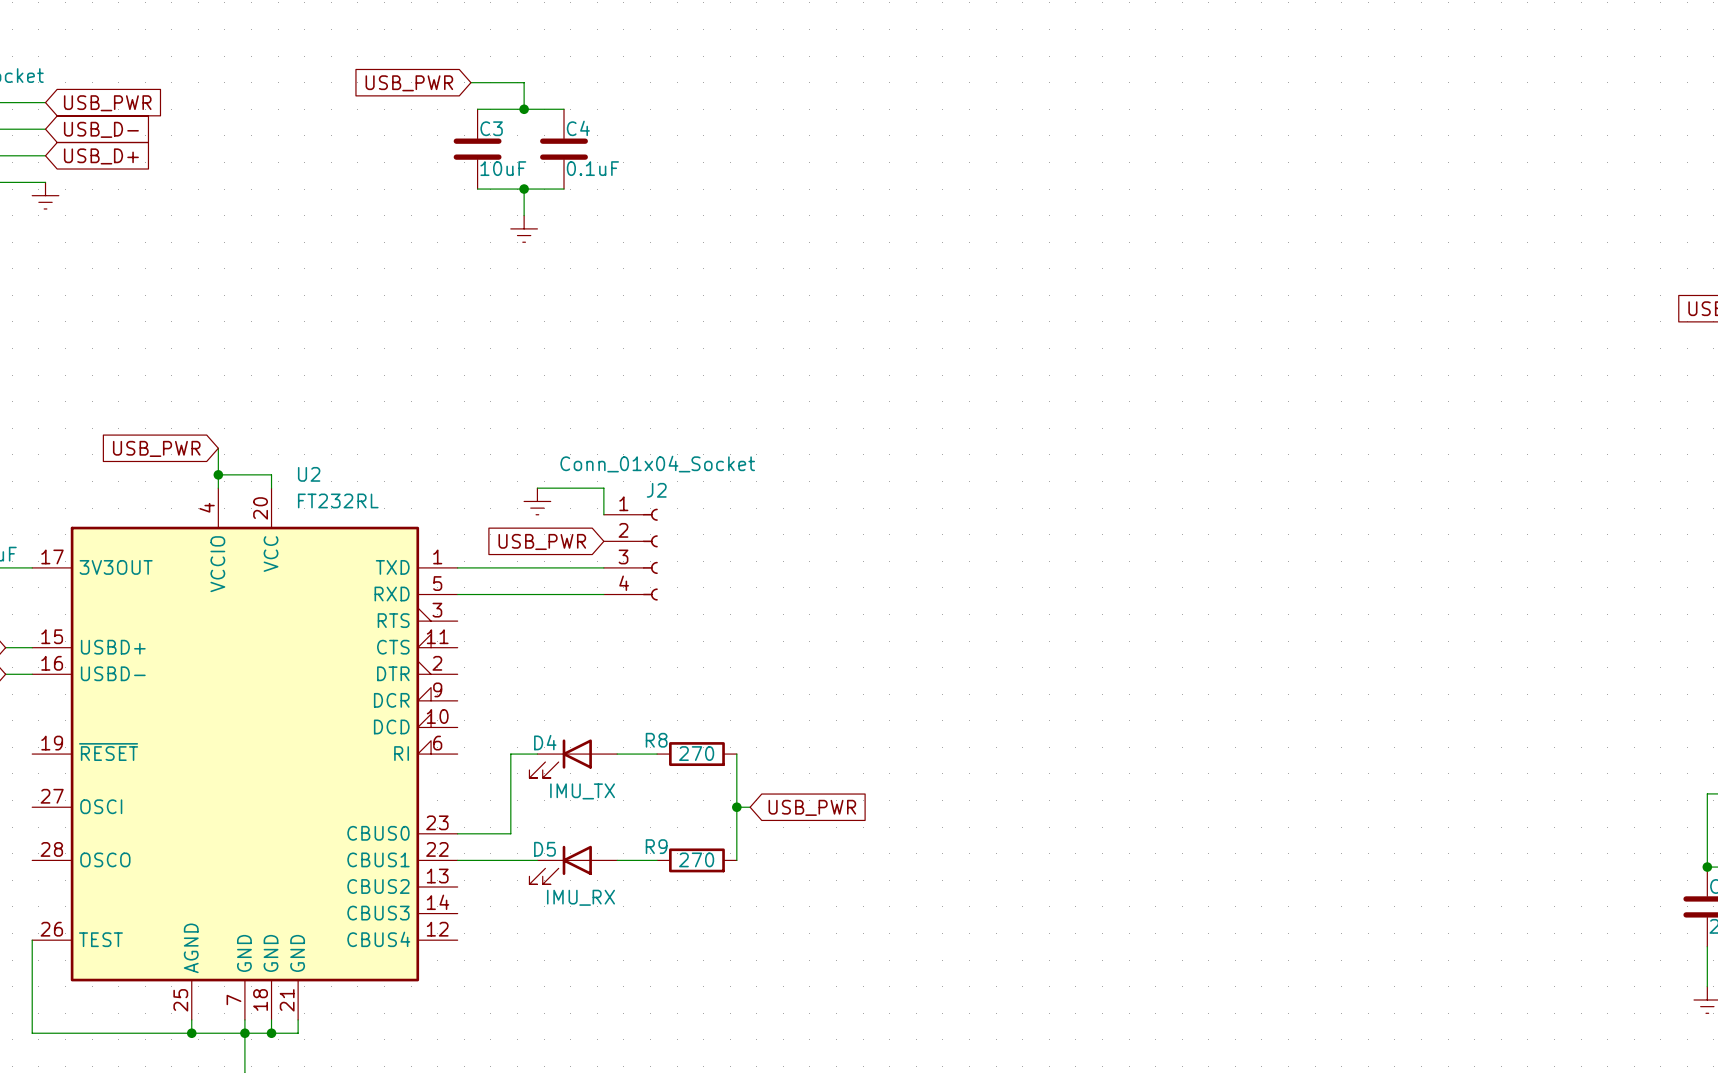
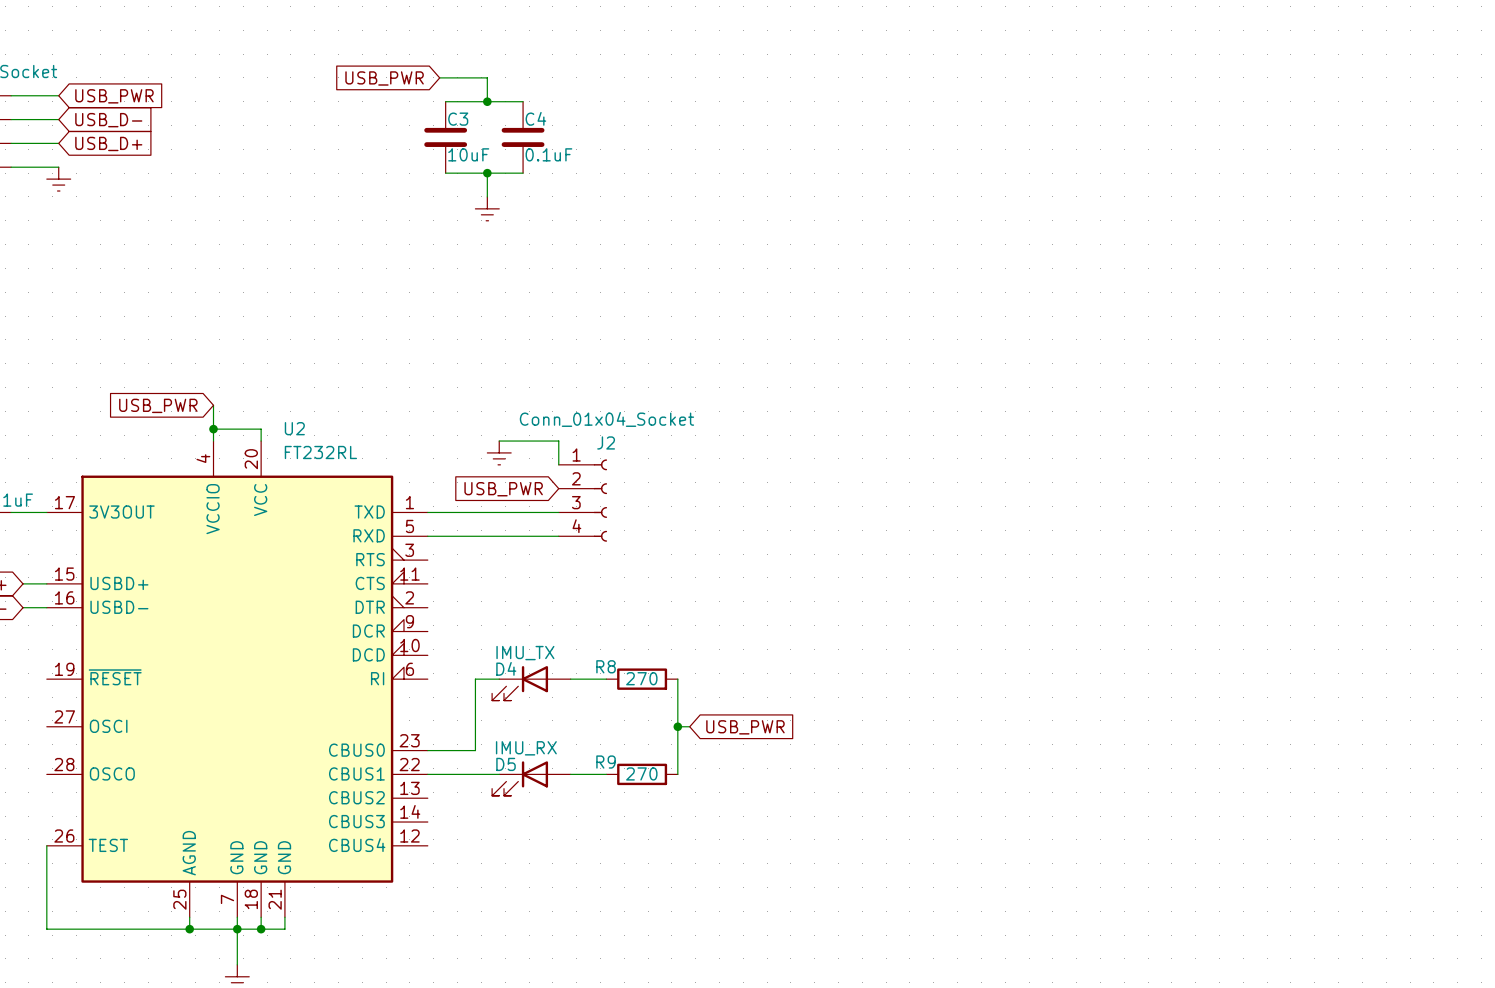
D4 value position: IMU_TX (582, 791) -> IMU_TX (525, 653)
D5 value position: IMU_RX (580, 897) -> IMU_RX (526, 748)

